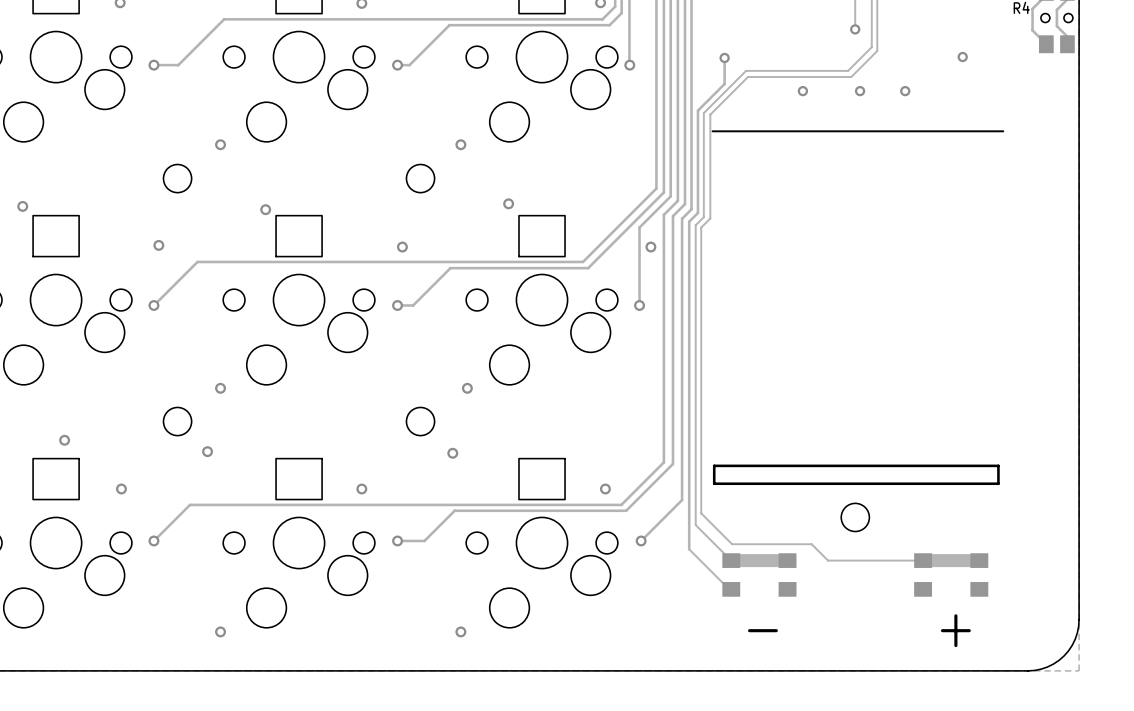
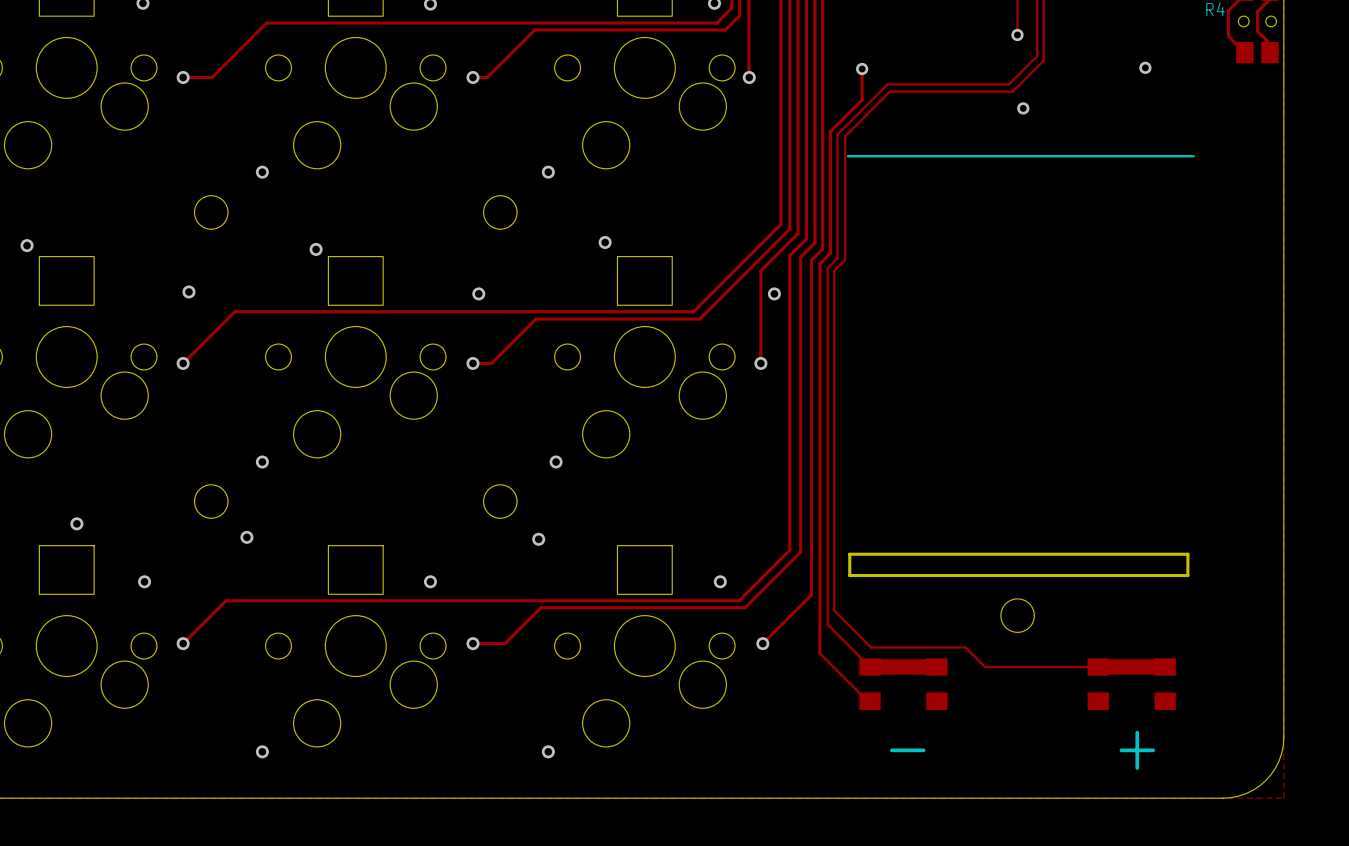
via: (802, 91) -> none
via: (905, 91) -> none

